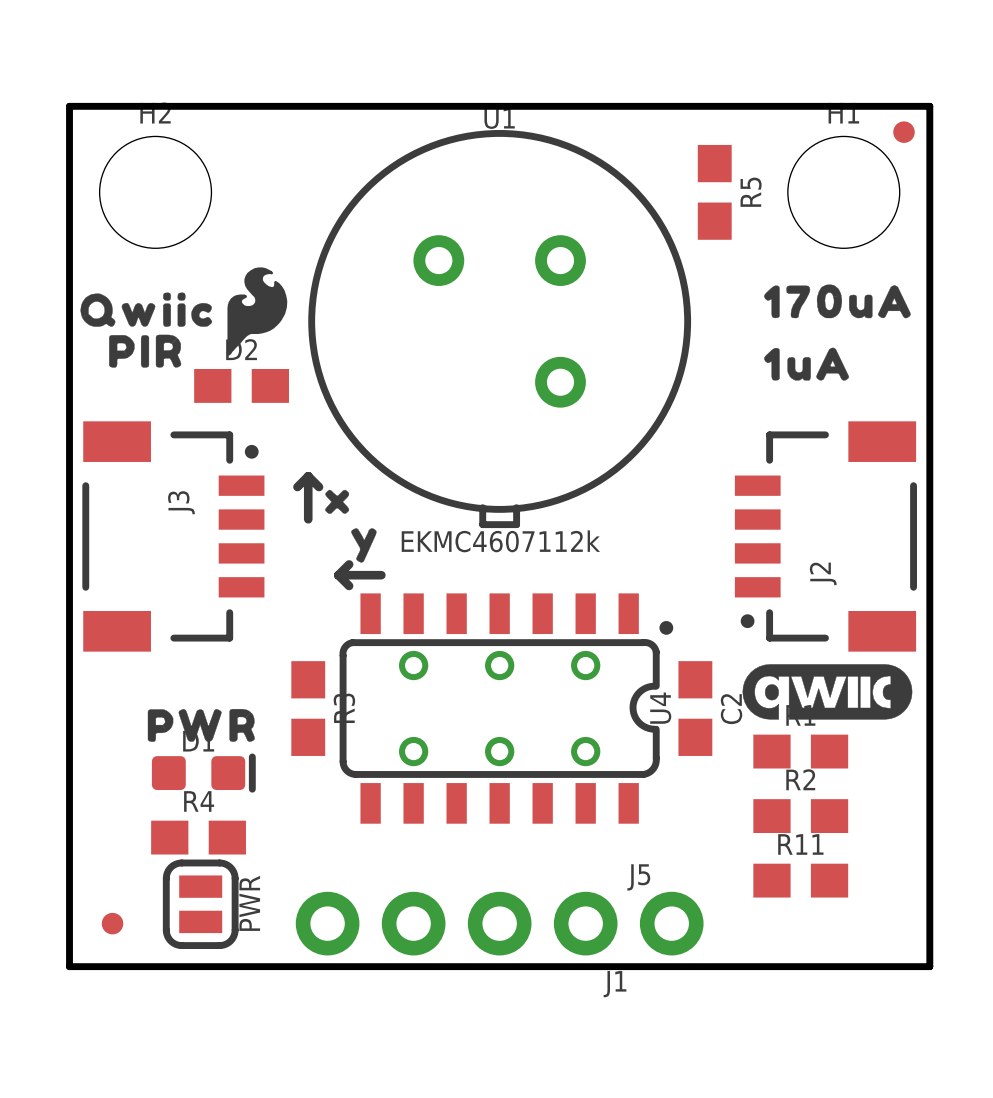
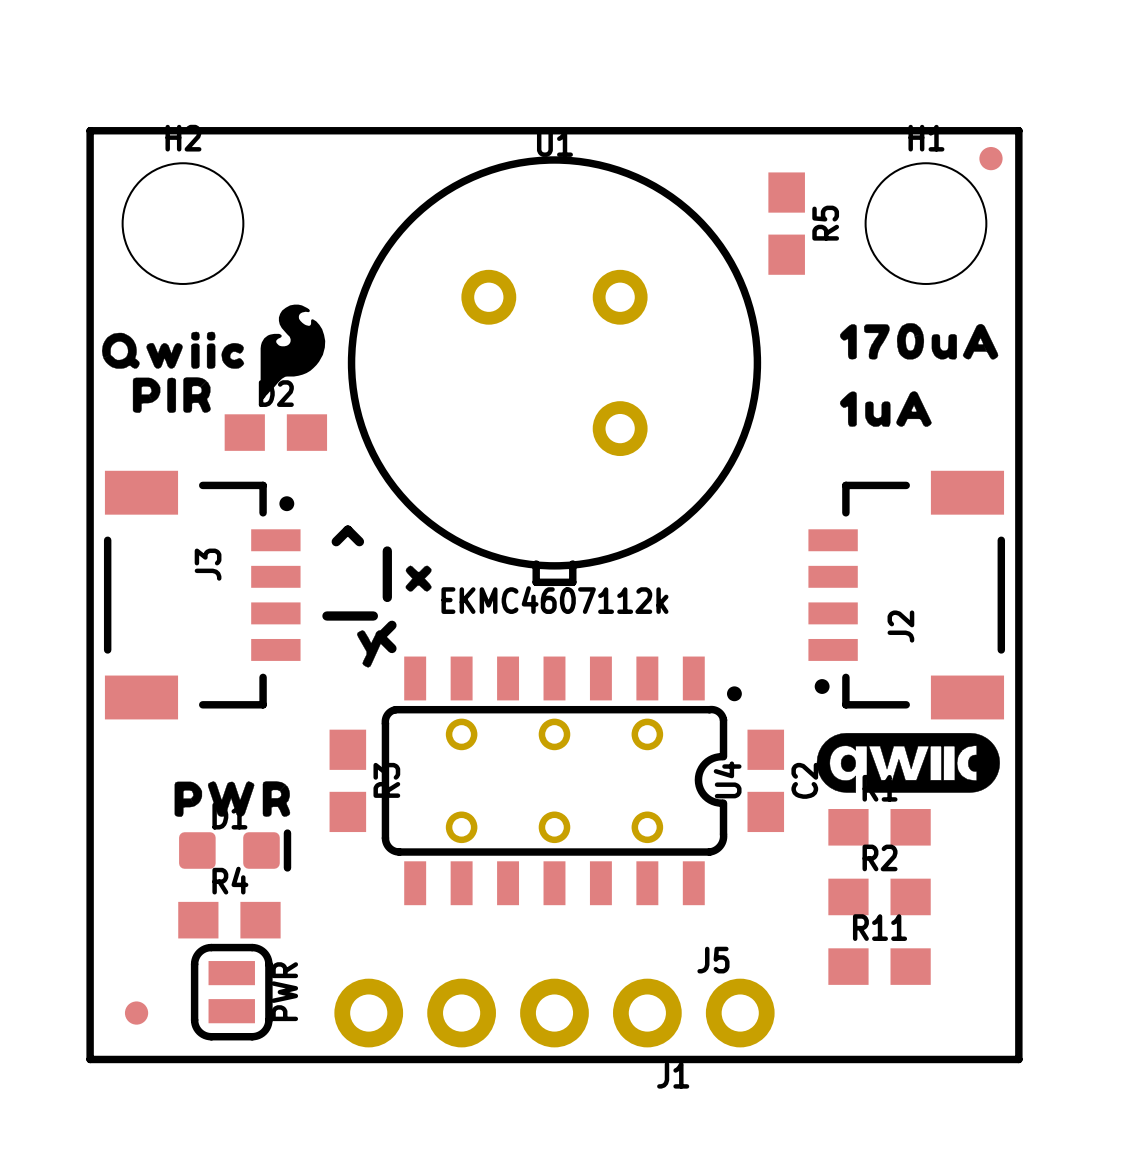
line: (308, 476) (308, 519) -> (387, 550) (387, 597)
drawing position: (337, 501) -> (418, 578)
drawing position: (363, 545) -> (370, 648)
line: (338, 575) (381, 575) -> (326, 616) (373, 616)

